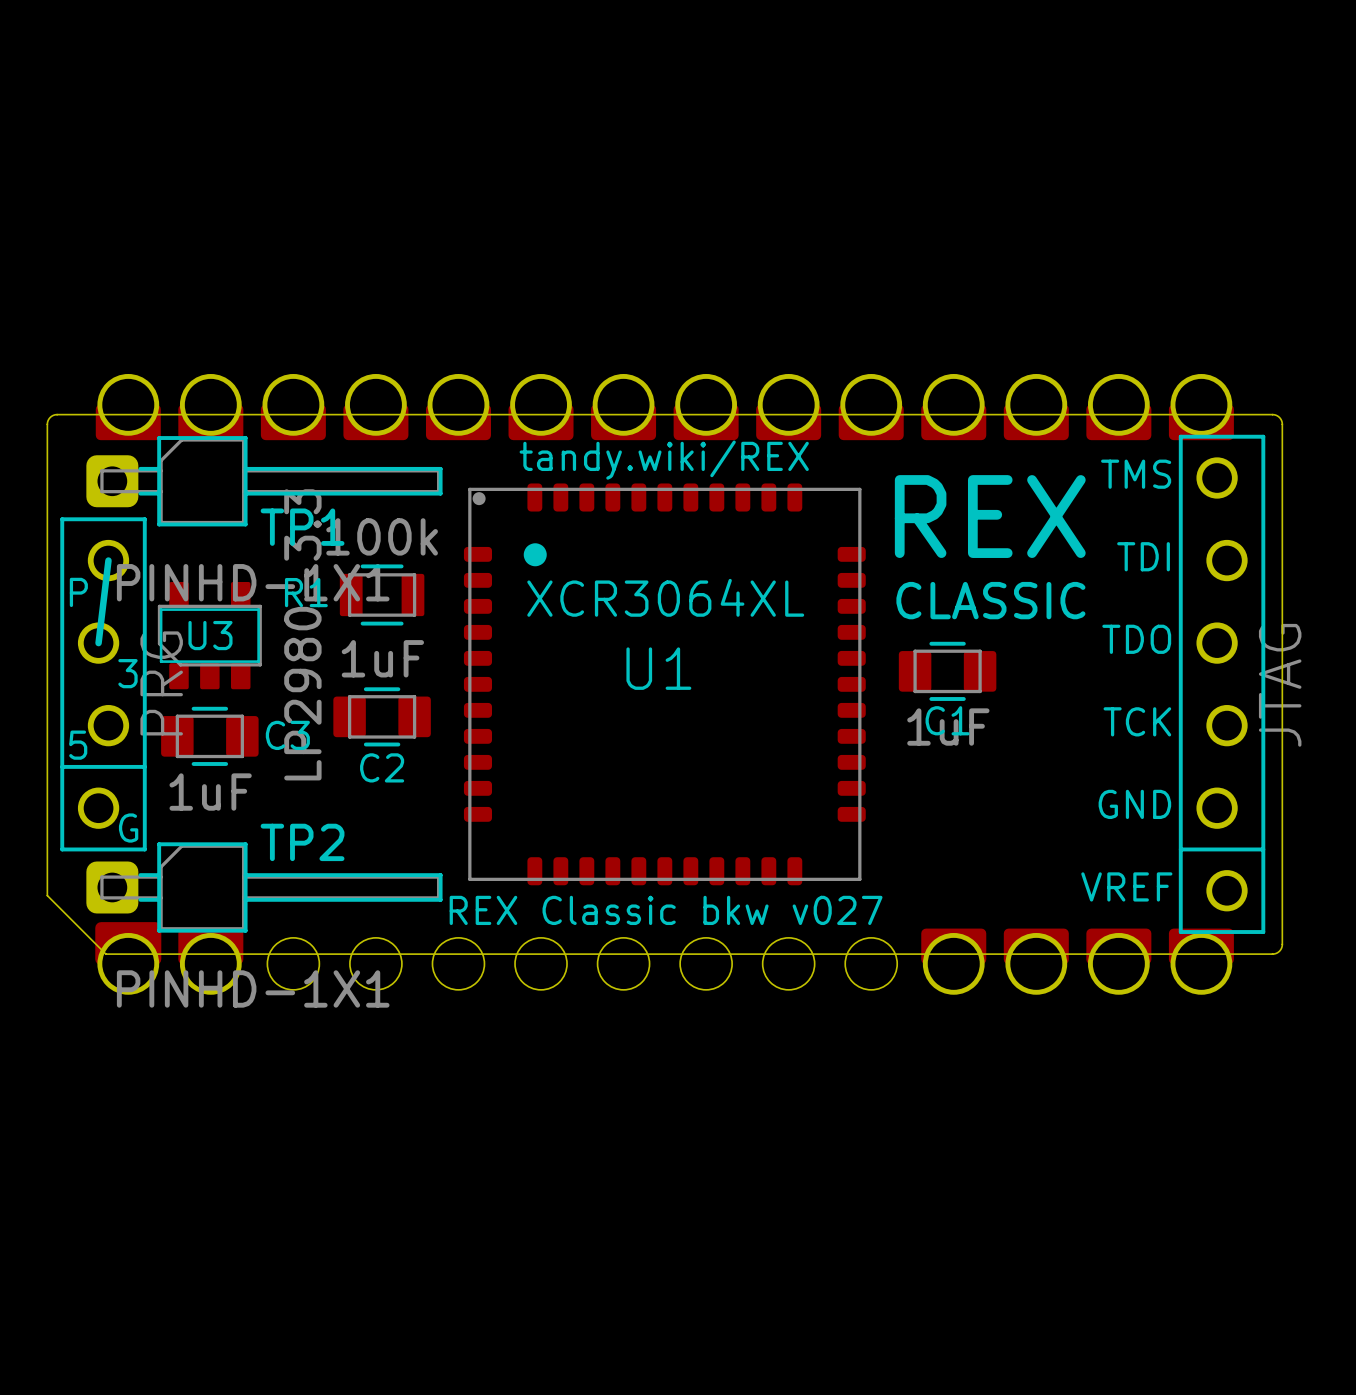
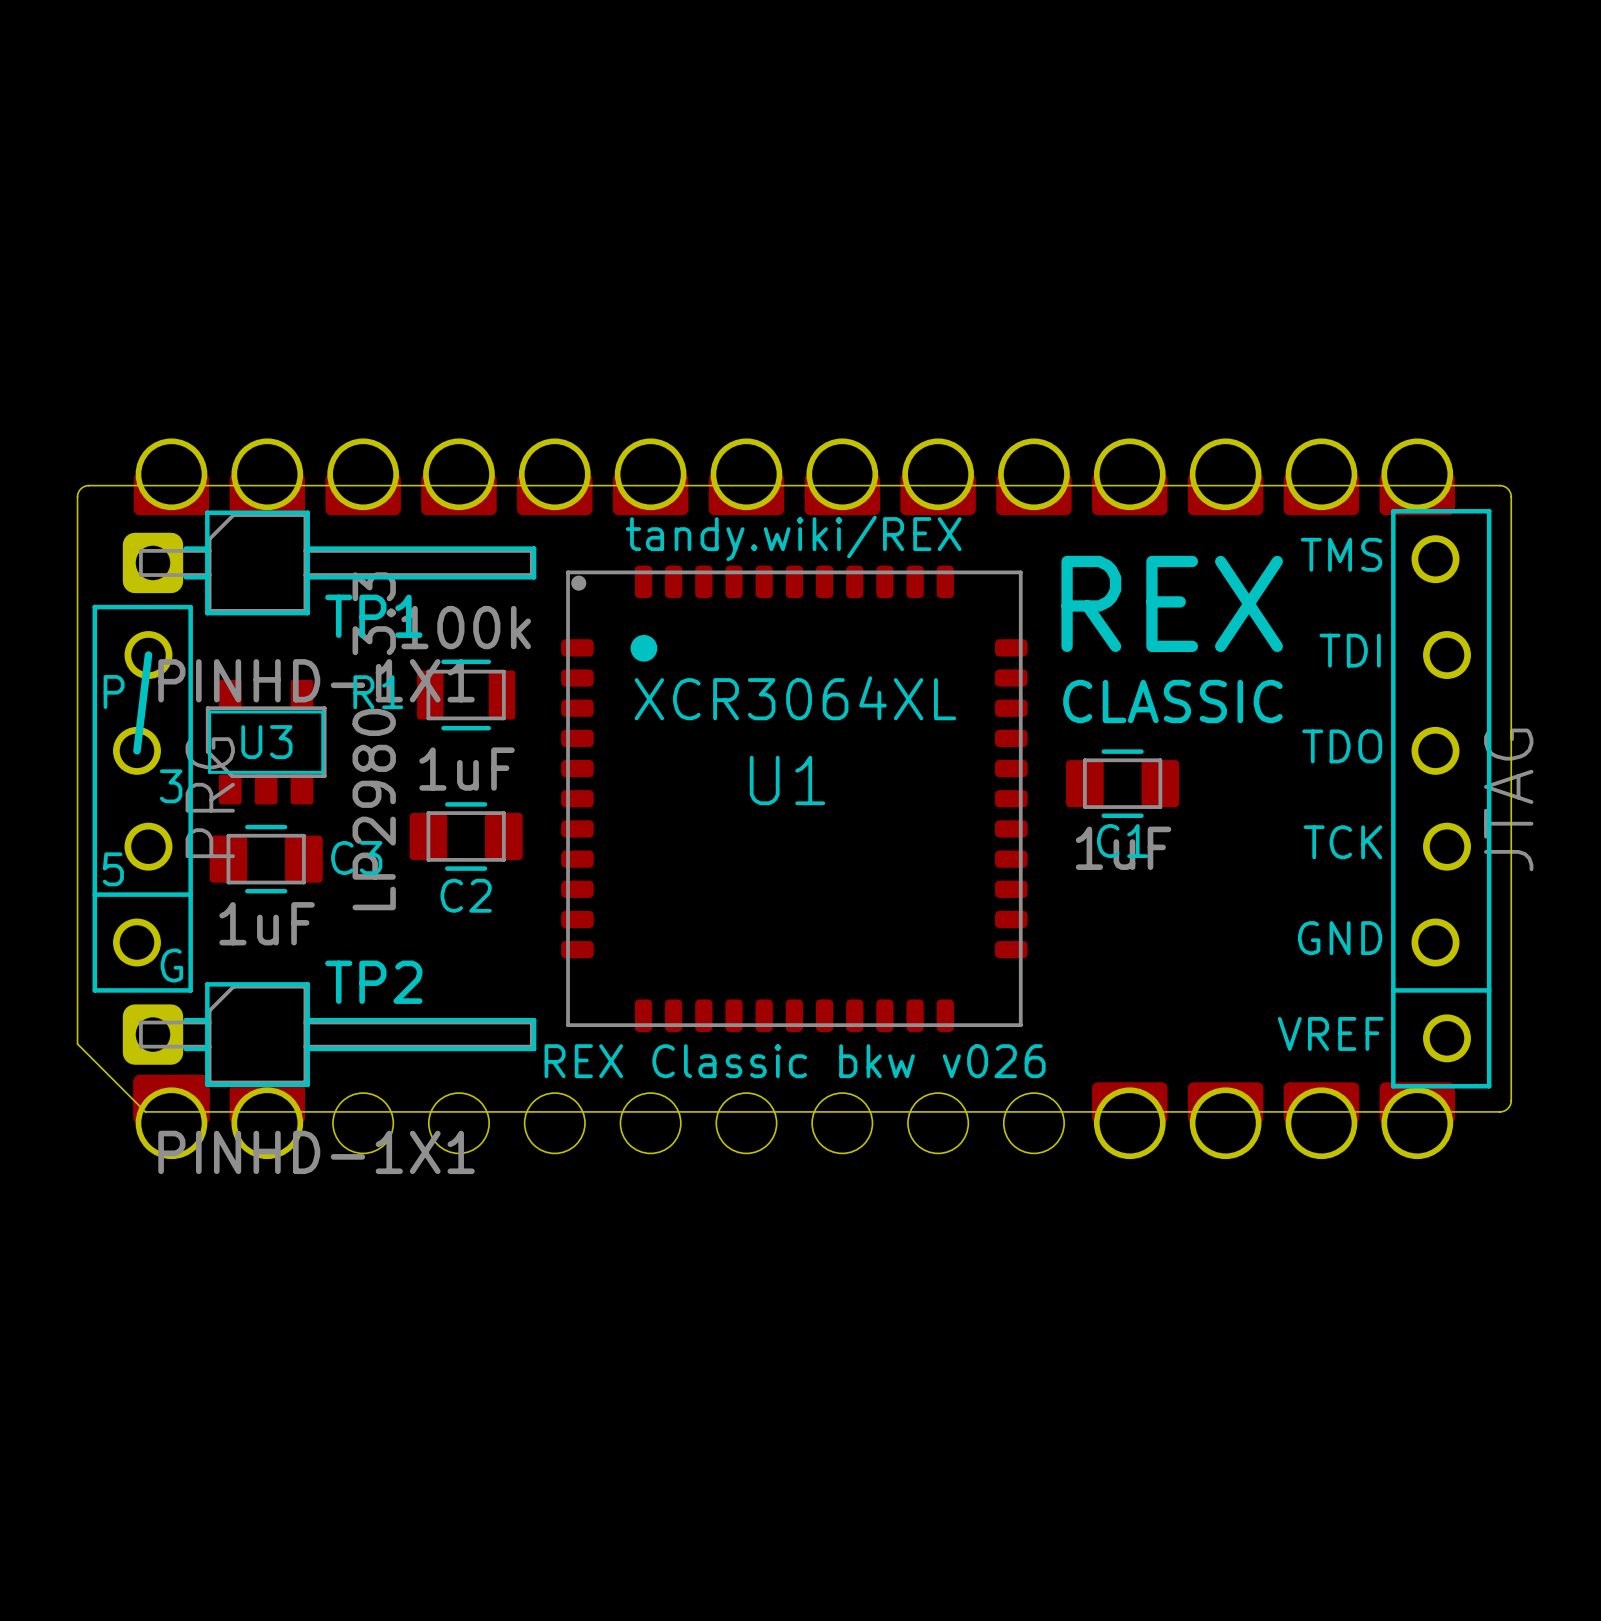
text: REX Classic bkw v027 (666, 910) -> REX Classic bkw v026 (795, 1061)

